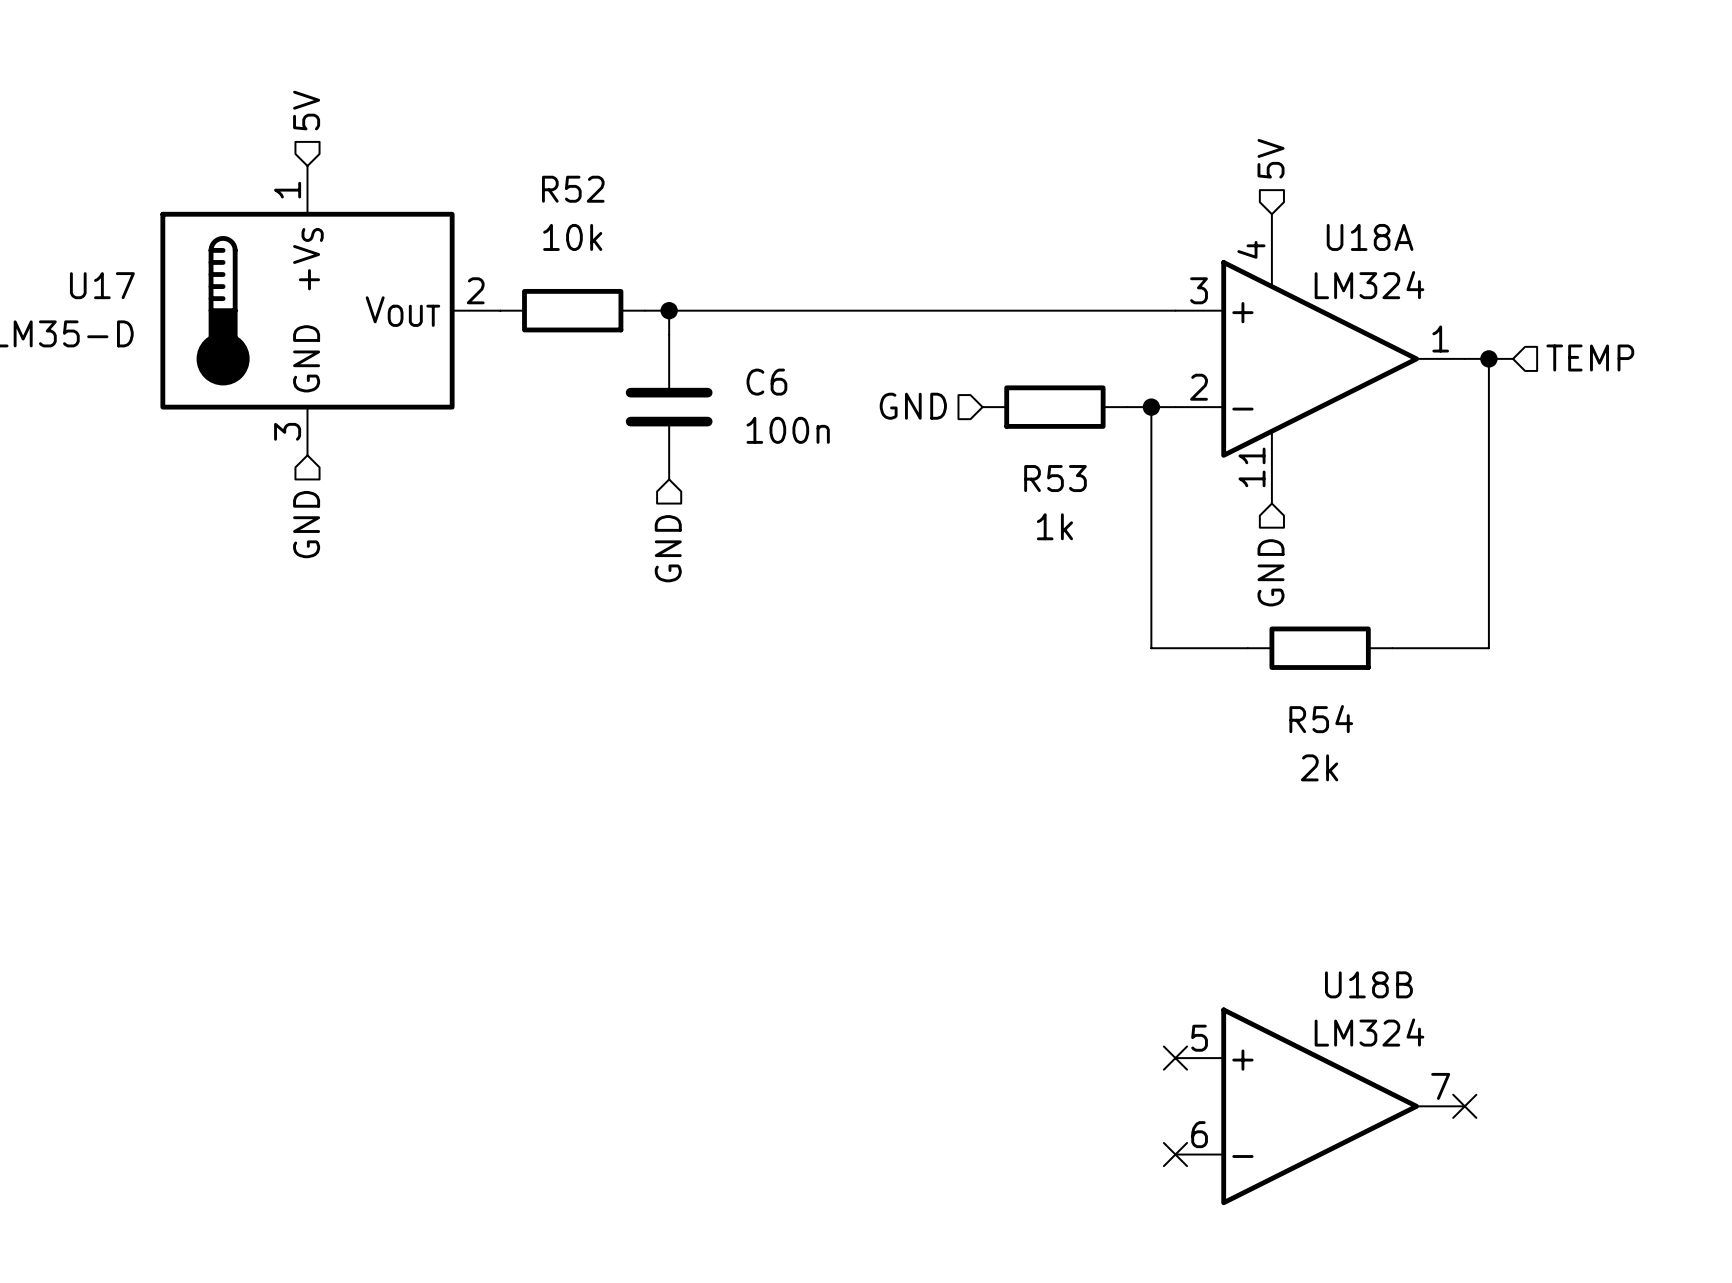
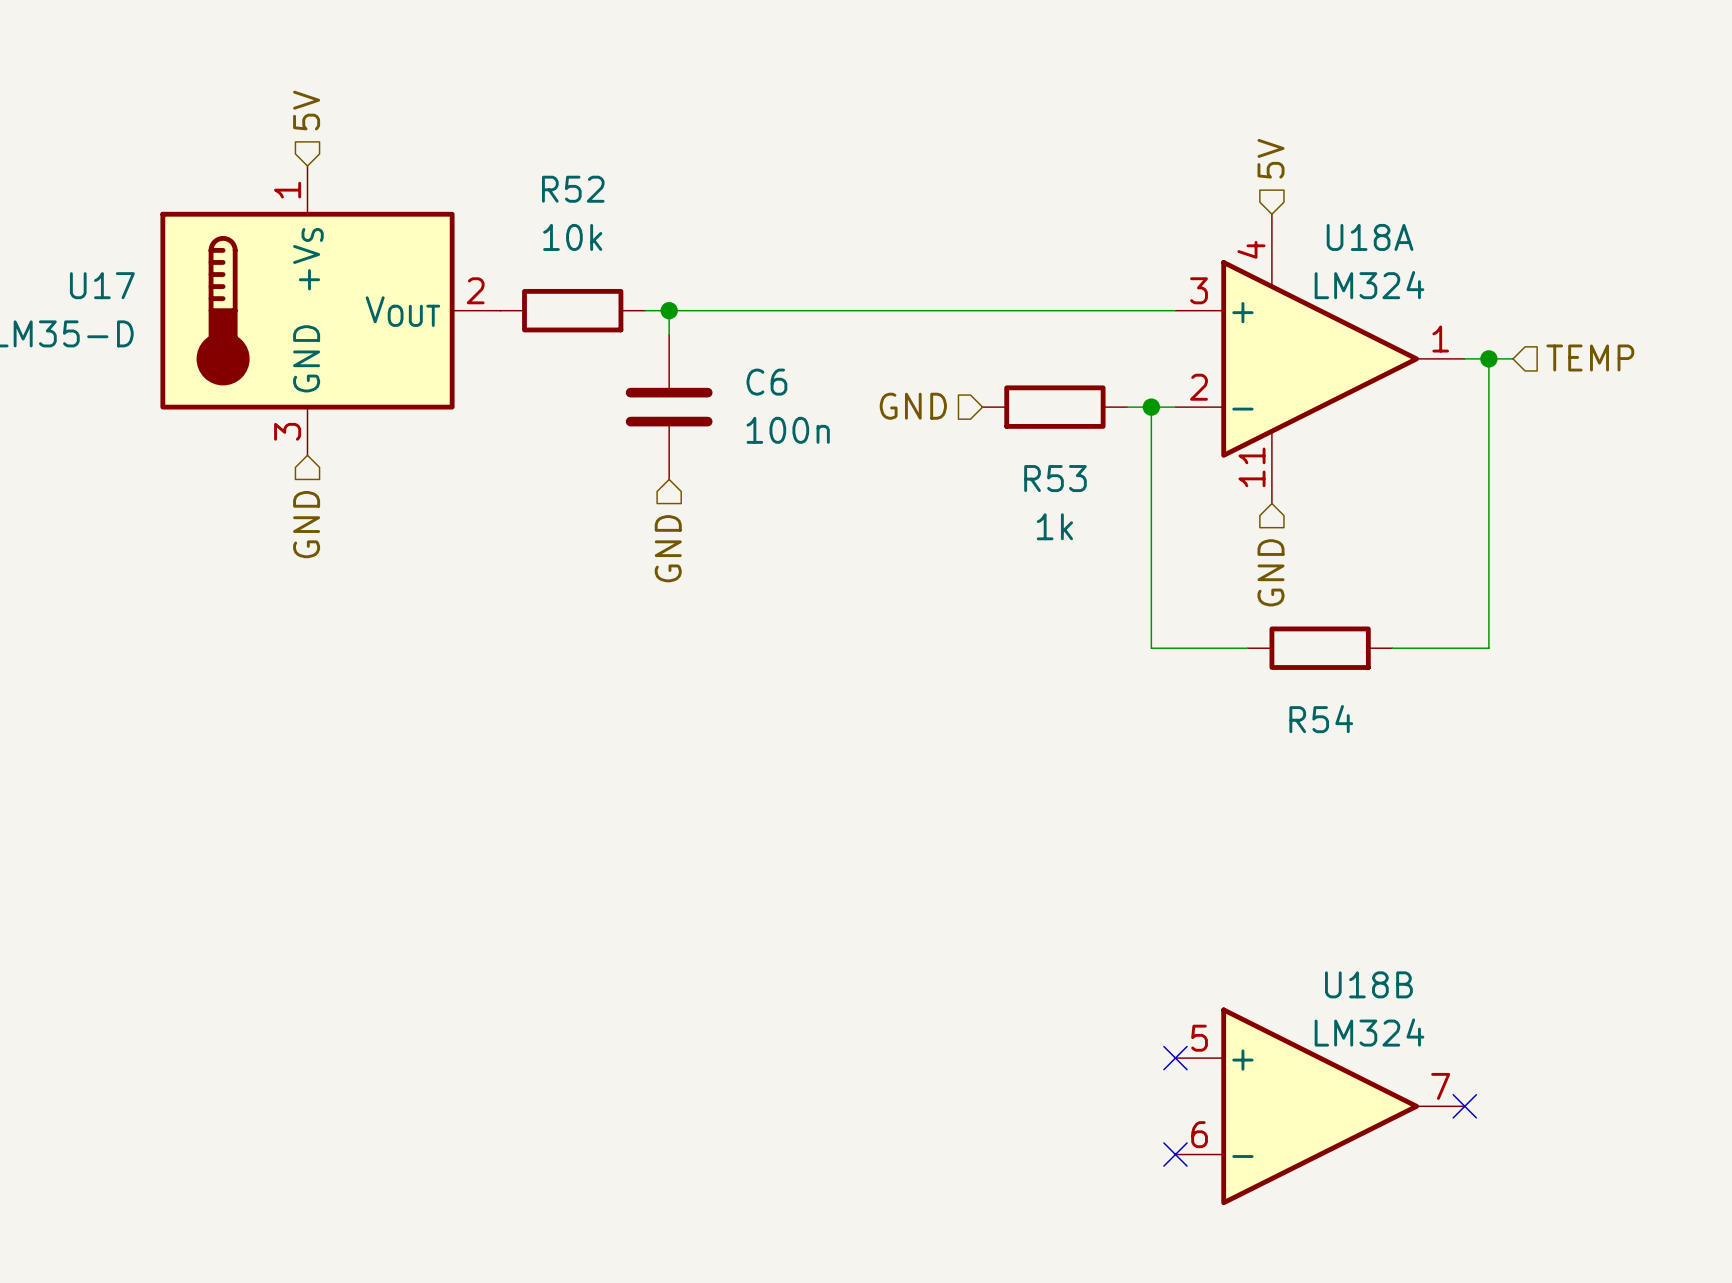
R54 value: 2k (1319, 767) -> none

